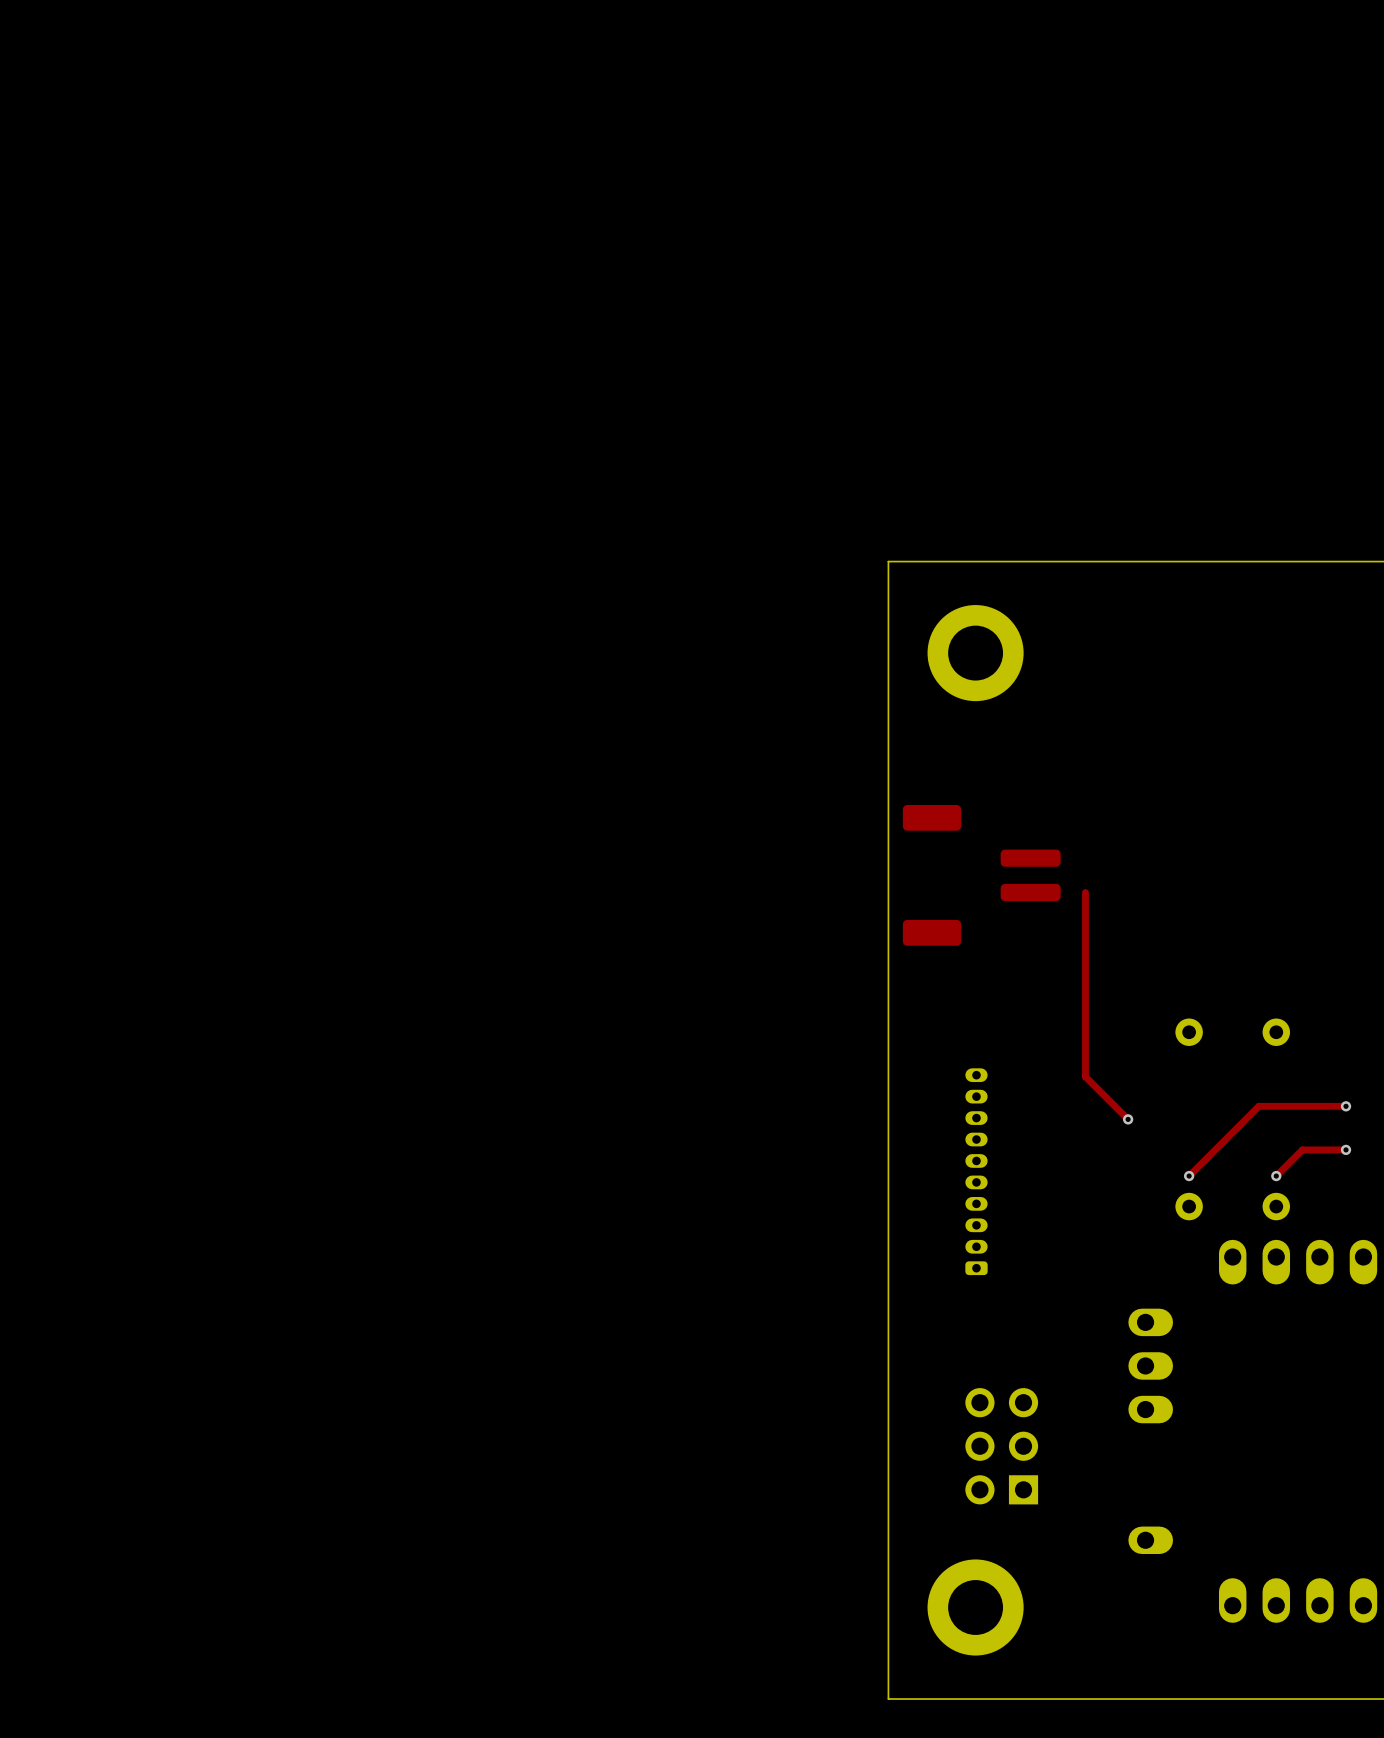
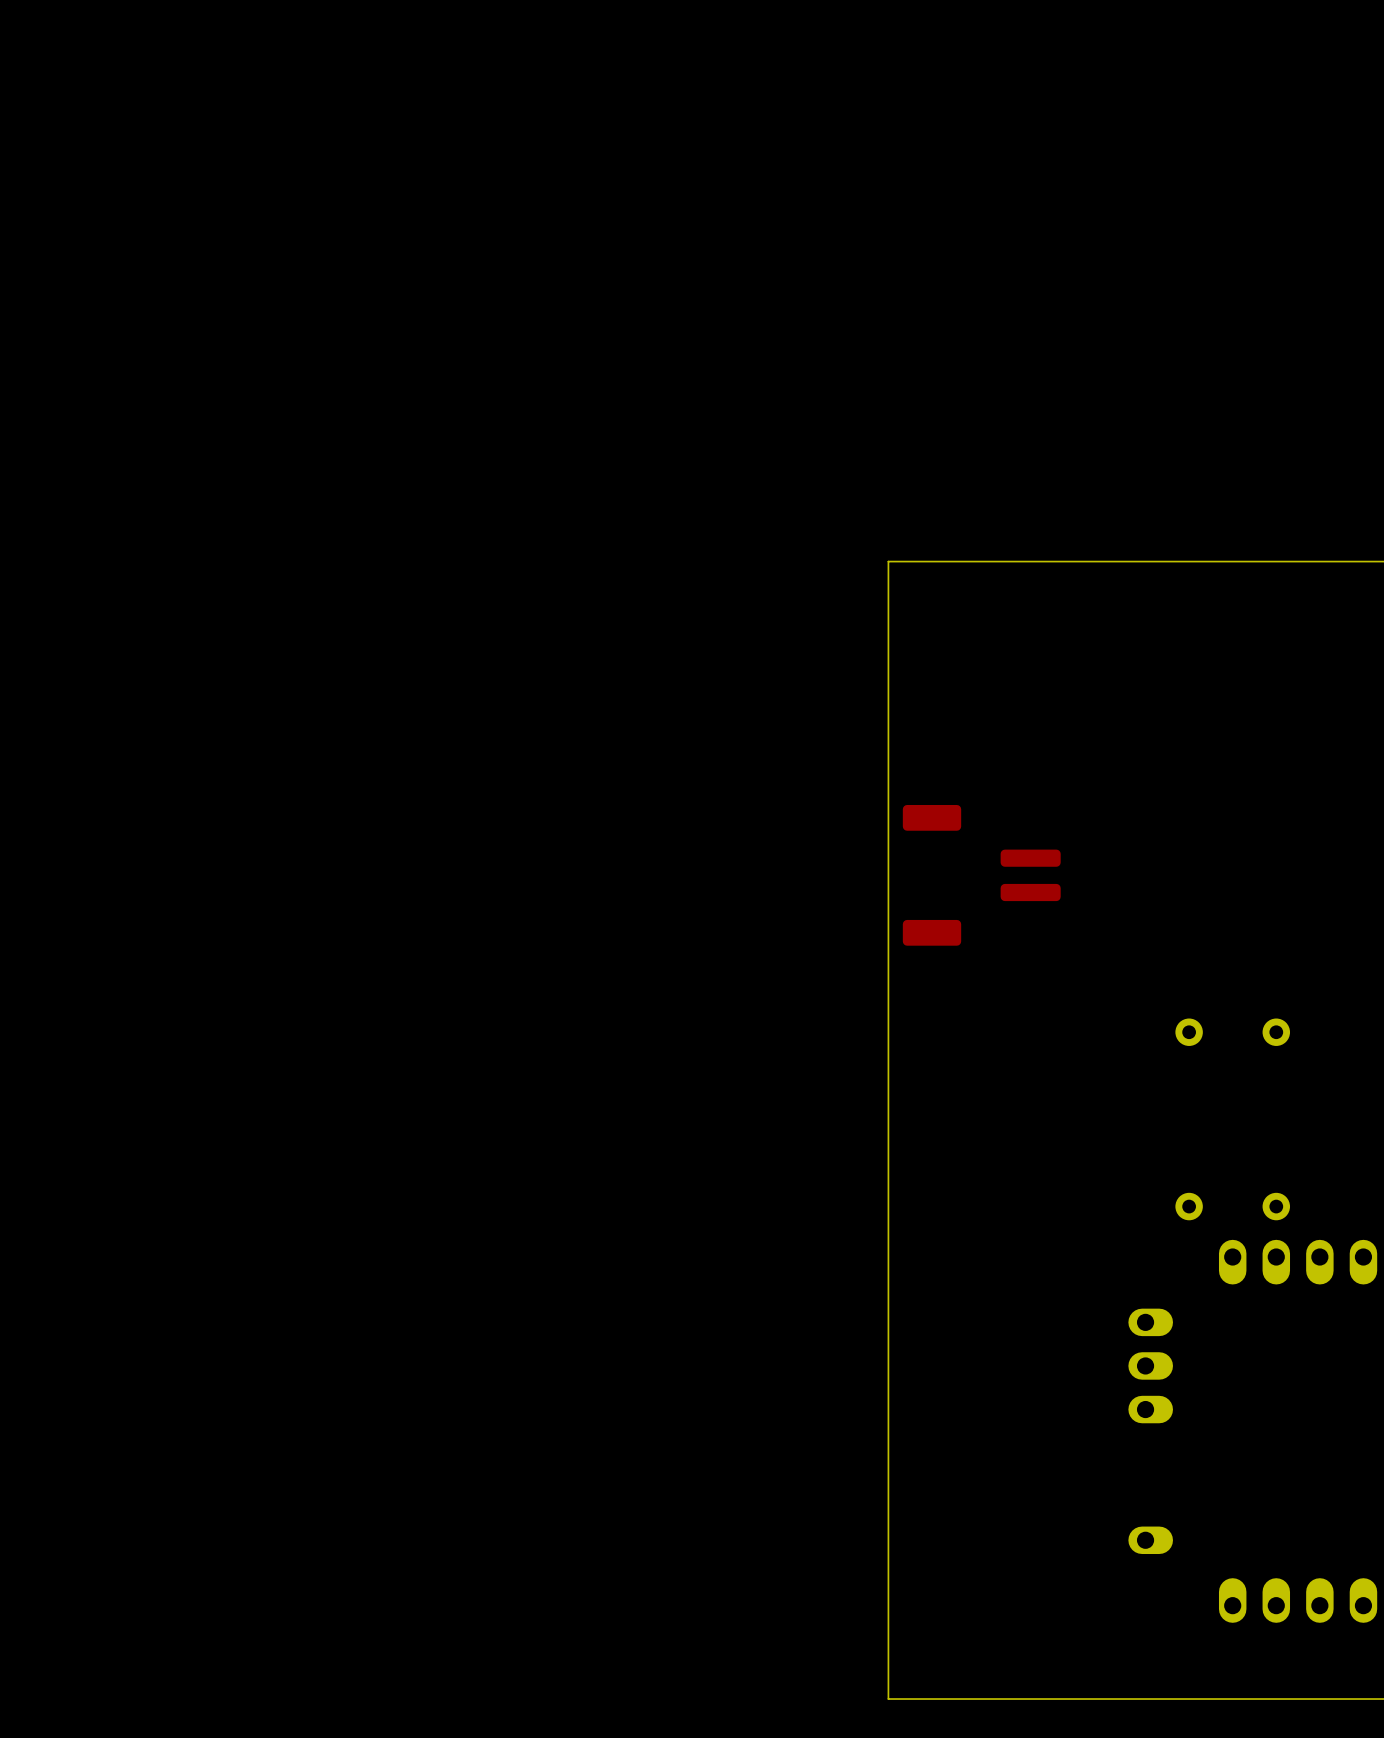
part: (975, 653) -> none
top track: (1085, 892) (1085, 1076) (1128, 1119) -> none
top track: (1346, 1106) (1258, 1106) (1189, 1176) -> none
via: (1346, 1106) -> none
via: (1128, 1119) -> none
top track: (1346, 1149) (1302, 1149) (1276, 1176) -> none
via: (1346, 1149) -> none
part: (976, 1171) -> none
via: (1189, 1176) -> none
via: (1276, 1176) -> none
part: (1001, 1446) -> none
part: (975, 1607) -> none

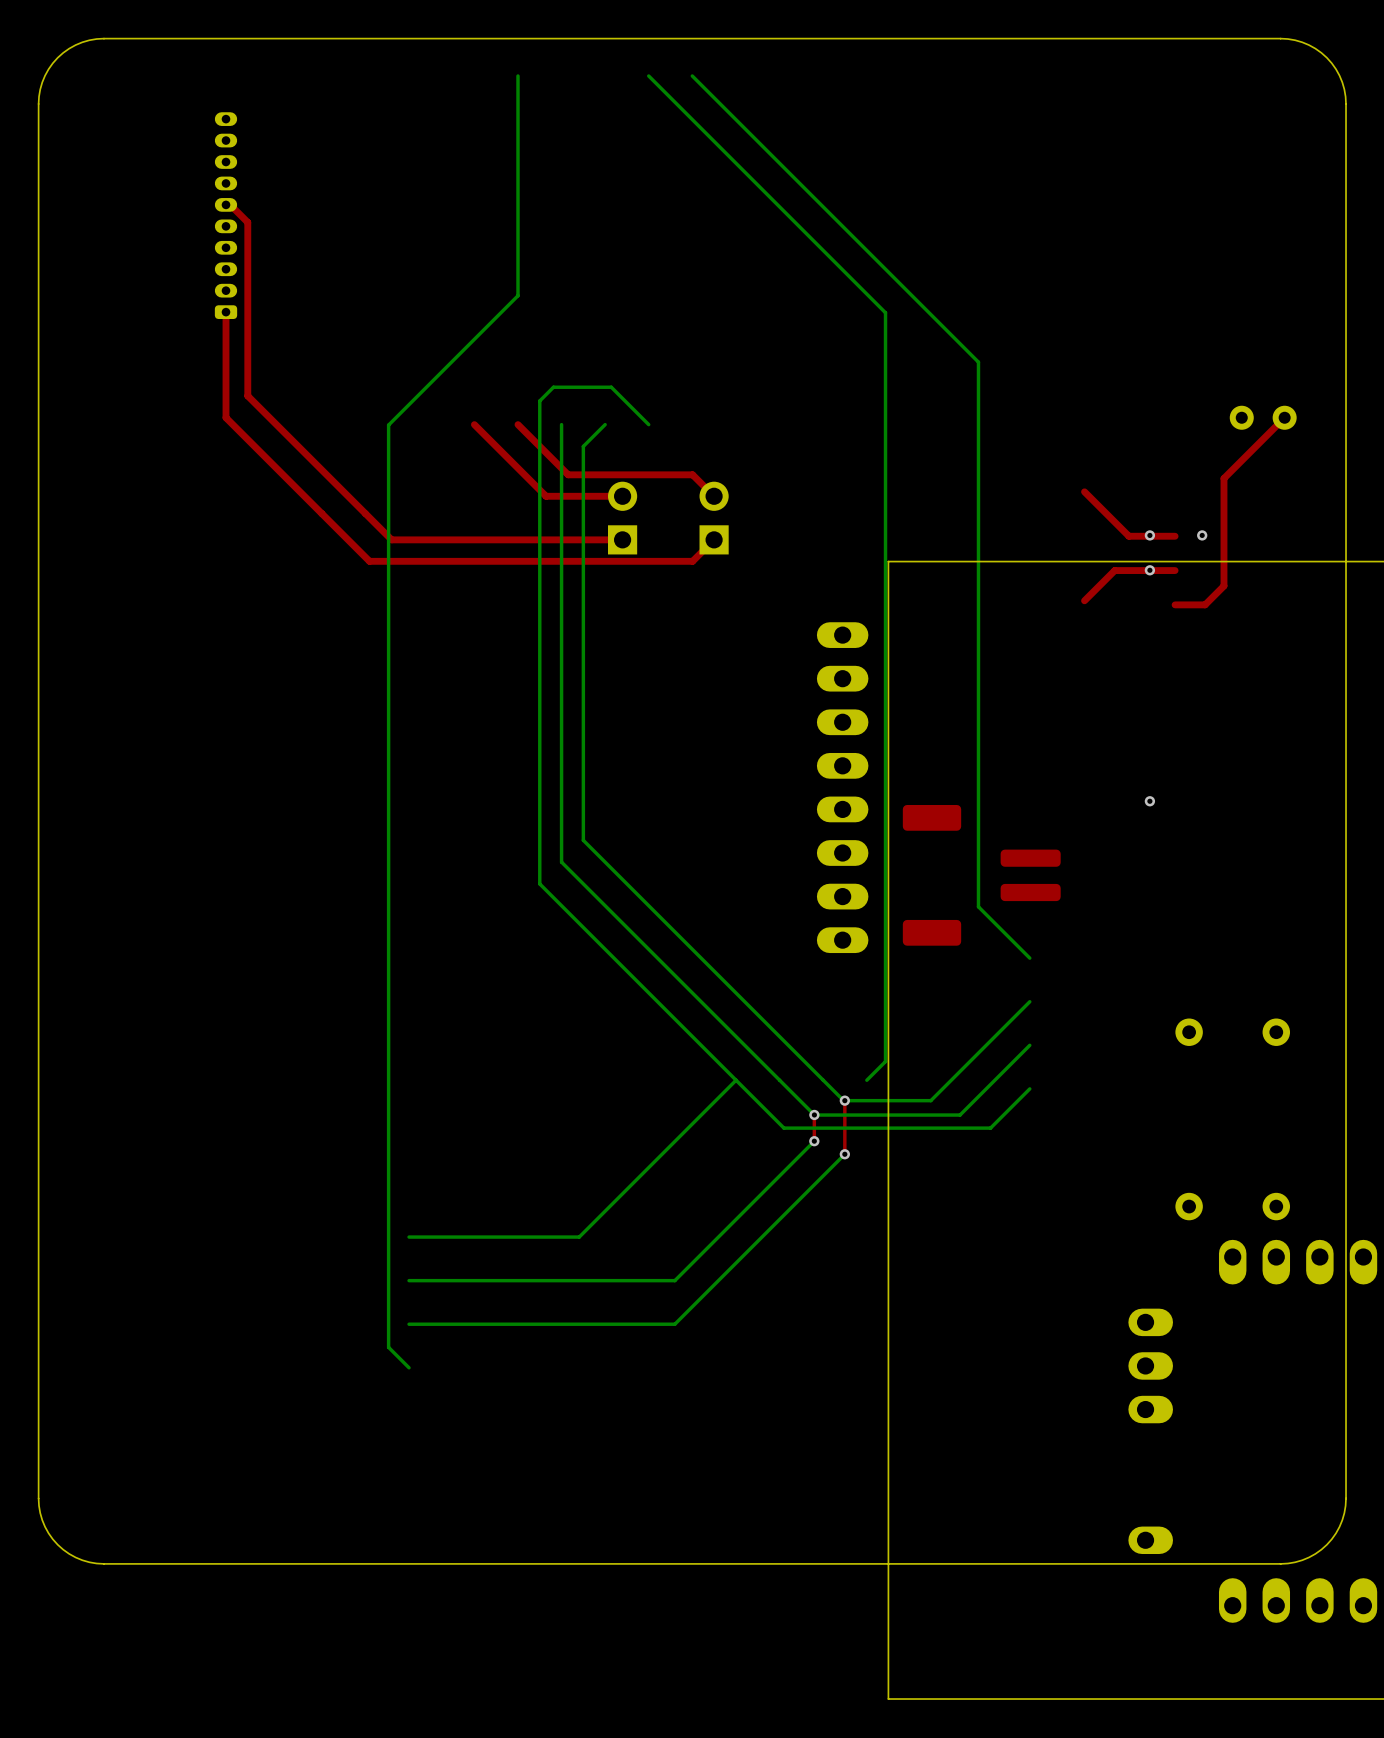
board edge: none -> (1280, 38) (103, 38) (89, 40) (75, 45) (63, 52) (52, 63) (42, 82) (38, 103) (38, 1498) (40, 1513) (45, 1526) (52, 1539) (63, 1549) (82, 1560) (103, 1563) (1280, 1563) (1295, 1562) (1309, 1557) (1321, 1549) (1331, 1539) (1342, 1520) (1346, 1498) (1346, 103) (1342, 82) (1335, 69) (1326, 57) (1309, 45) (1295, 40) (1280, 38)
bottom track: none -> (517, 75) (517, 295) (388, 425) (388, 1347) (409, 1367)
bottom track: none -> (648, 75) (885, 312) (885, 1061) (866, 1080)
bottom track: none -> (692, 75) (978, 362) (978, 906) (1029, 958)
top track: none -> (226, 204) (230, 204) (247, 222) (247, 395) (391, 539) (622, 539)
part: none -> (226, 215)
top track: none -> (226, 312) (226, 417) (369, 561) (692, 561) (714, 539)
part: none -> (1263, 417)
top track: none -> (1284, 417) (1223, 478) (1223, 586) (1205, 604) (1175, 604)
top track: none -> (474, 424) (546, 496) (622, 496)
top track: none -> (517, 424) (568, 474) (692, 474) (714, 496)
bottom track: none -> (561, 424) (561, 862) (814, 1115) (960, 1115) (1029, 1045)
bottom track: none -> (605, 424) (583, 446) (583, 840) (843, 1100) (930, 1100) (1029, 1001)
bottom track: none -> (648, 424) (611, 387) (553, 387) (539, 400) (539, 883) (783, 1128) (990, 1128) (1029, 1088)
top track: none -> (1084, 491) (1128, 536) (1175, 536)
part: none -> (622, 518)
part: none -> (714, 518)
via: none -> (1149, 535)
via: none -> (1202, 535)
via: none -> (1149, 570)
top track: none -> (1175, 570) (1114, 570) (1084, 600)
part: none -> (842, 787)
via: none -> (1149, 801)
bottom track: none -> (736, 1080) (579, 1237) (409, 1237)
top track: none -> (844, 1100) (844, 1154)
via: none -> (844, 1100)
via: none -> (814, 1114)
top track: none -> (814, 1115) (814, 1141)
bottom track: none -> (814, 1141) (674, 1280) (409, 1280)
via: none -> (814, 1141)
bottom track: none -> (844, 1154) (674, 1324) (409, 1324)
via: none -> (844, 1154)

